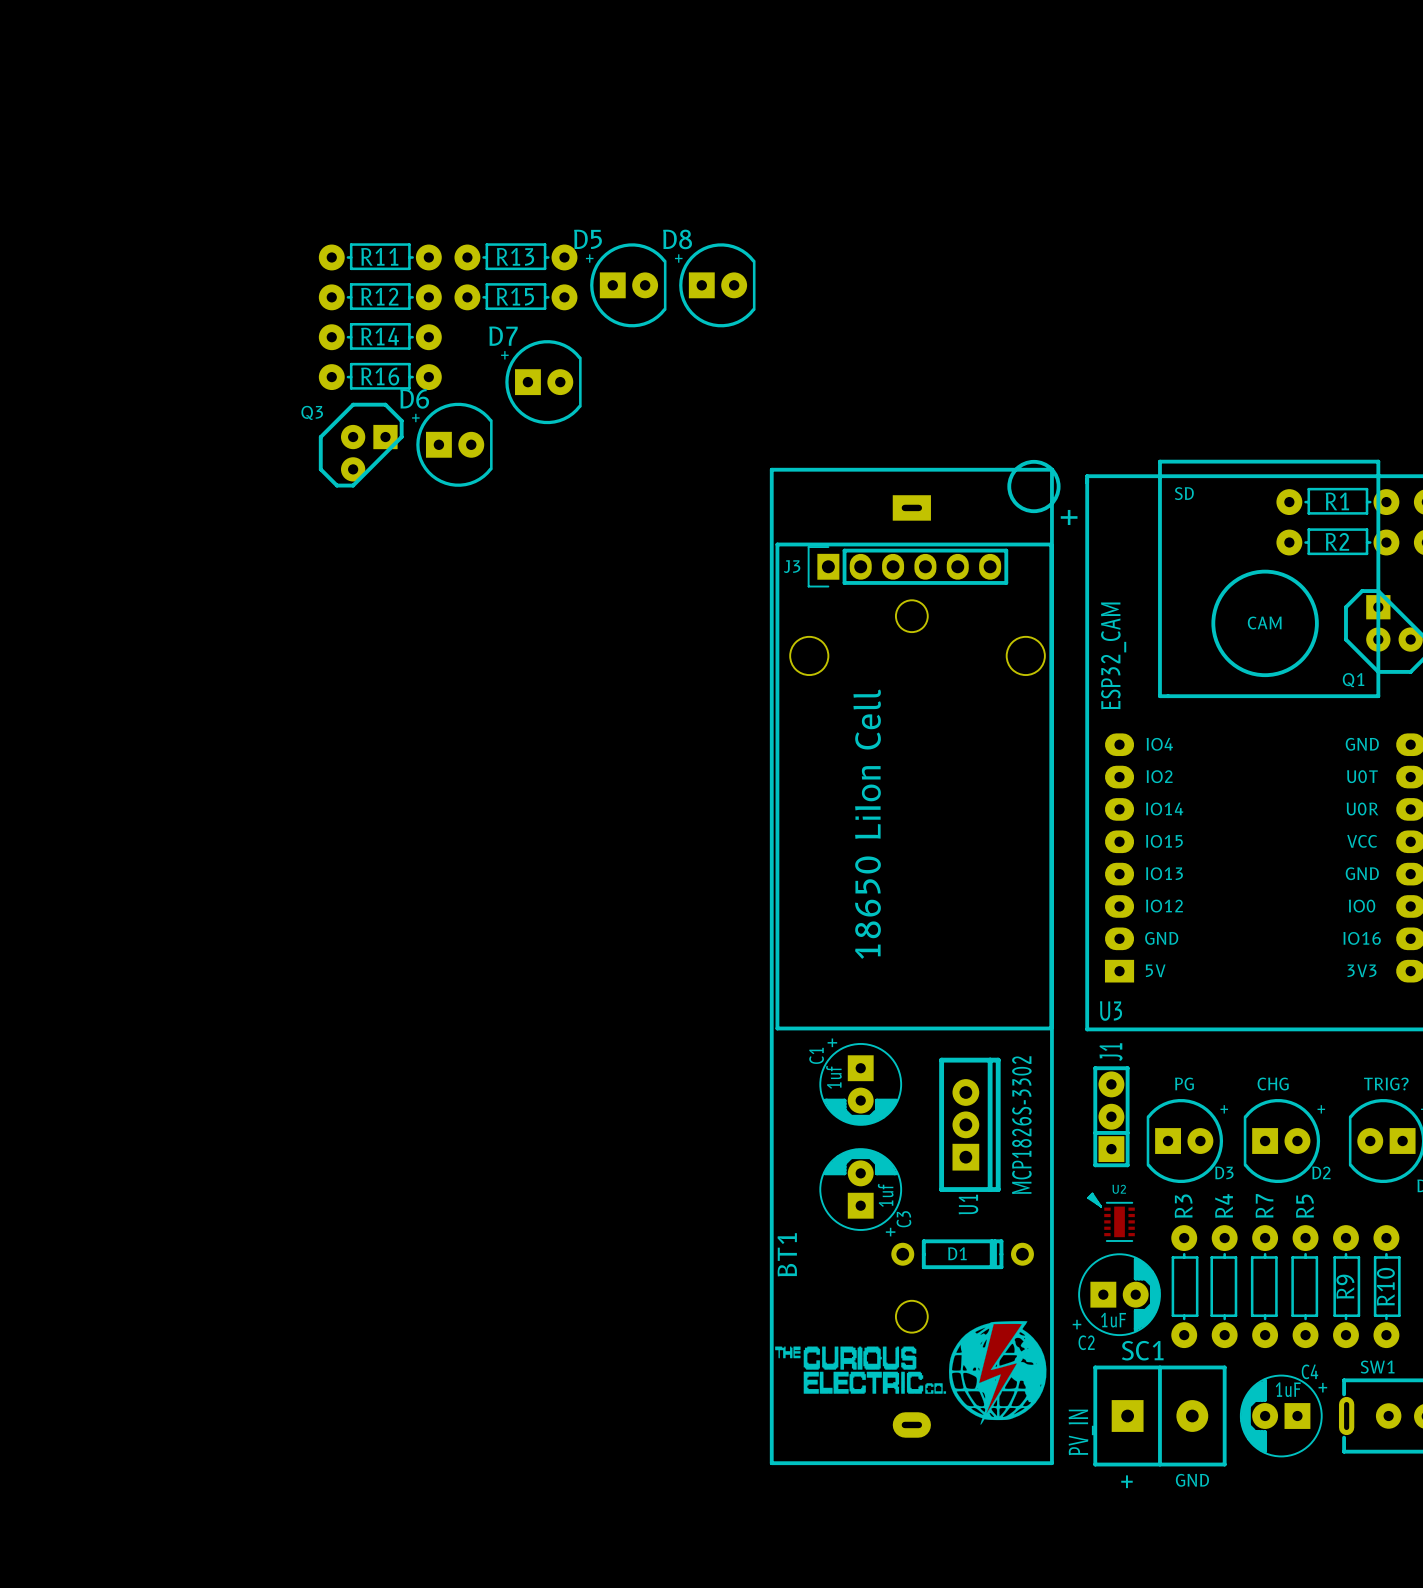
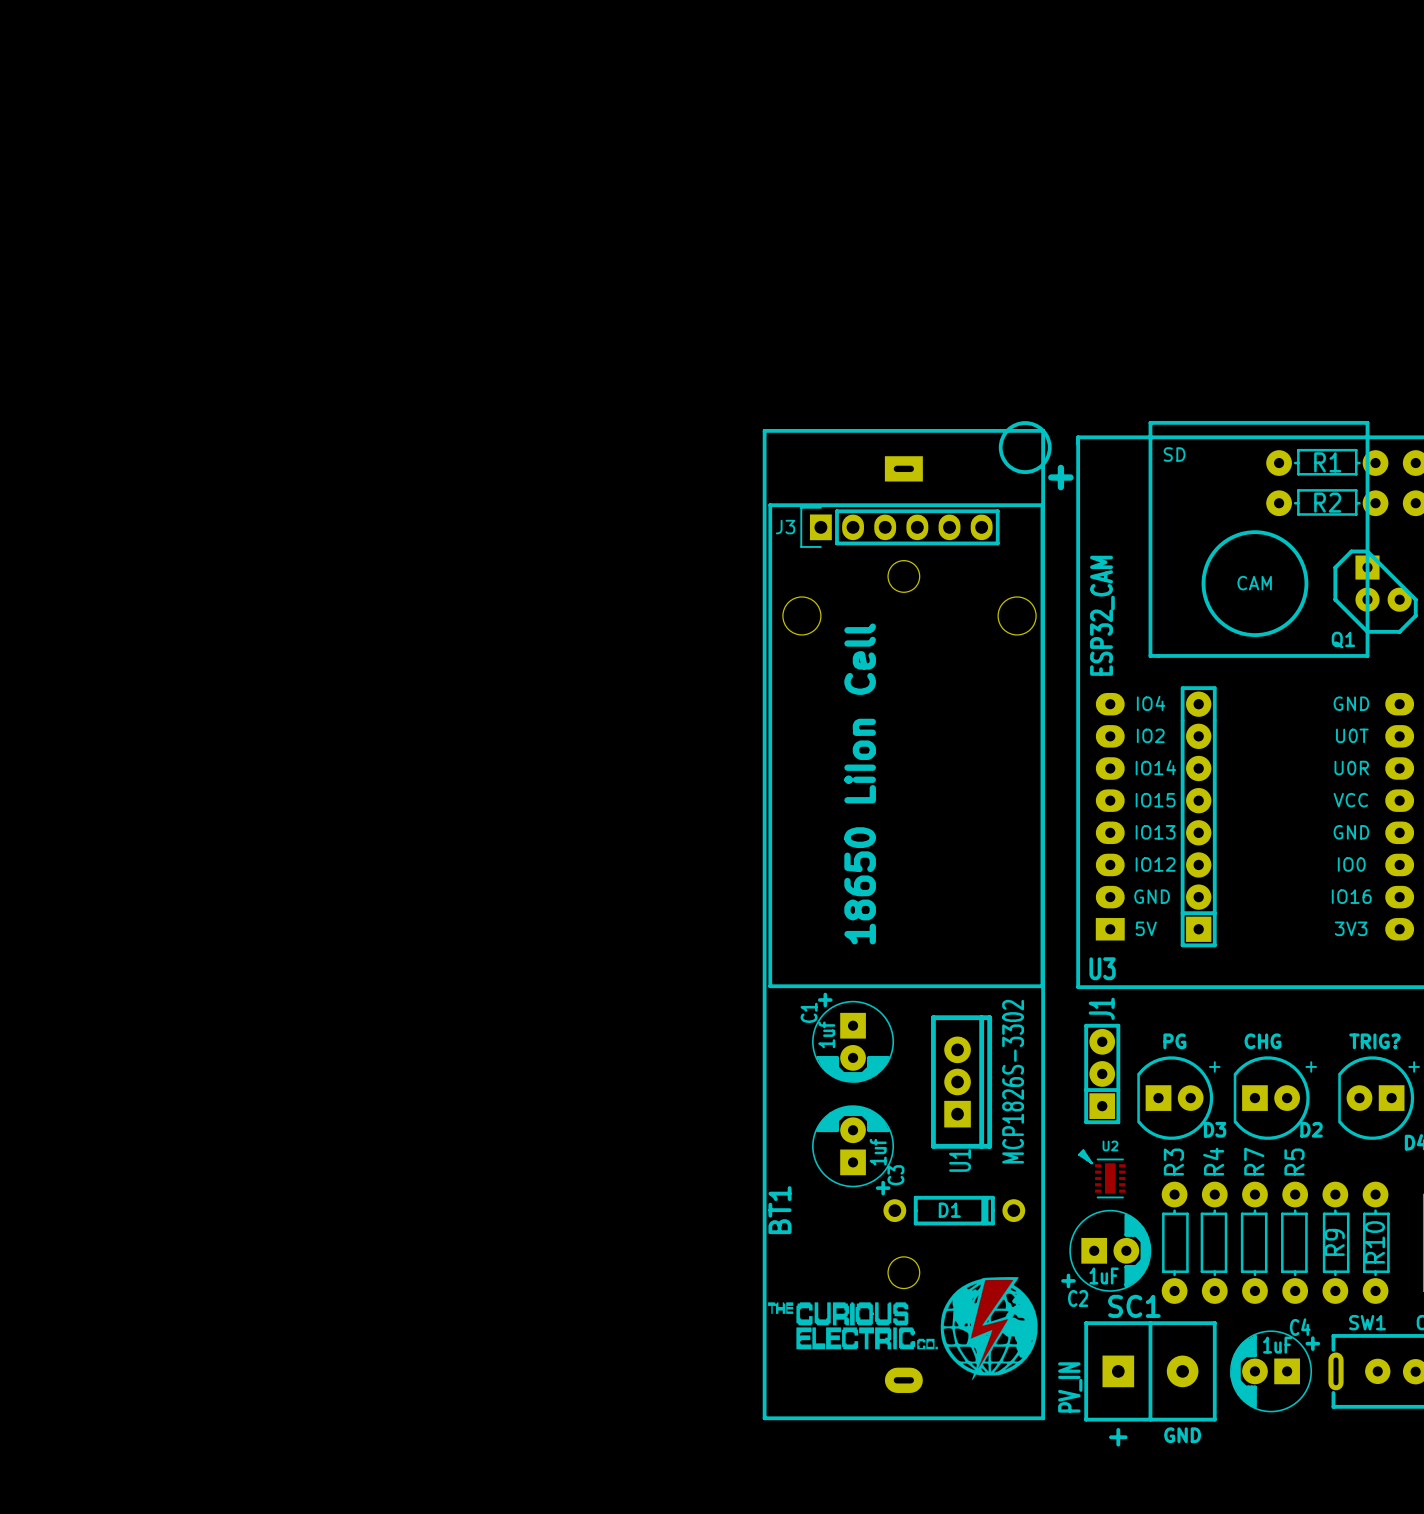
R11: (380, 256) -> none
R13: (515, 256) -> none
D5: (628, 285) -> none
D8: (717, 285) -> none
R12: (380, 296) -> none
R15: (515, 296) -> none
R14: (380, 336) -> none
R16: (380, 376) -> none
D7: (543, 382) -> none
D6: (454, 444) -> none
Q3: (361, 445) -> none
part: none -> (1198, 816)

